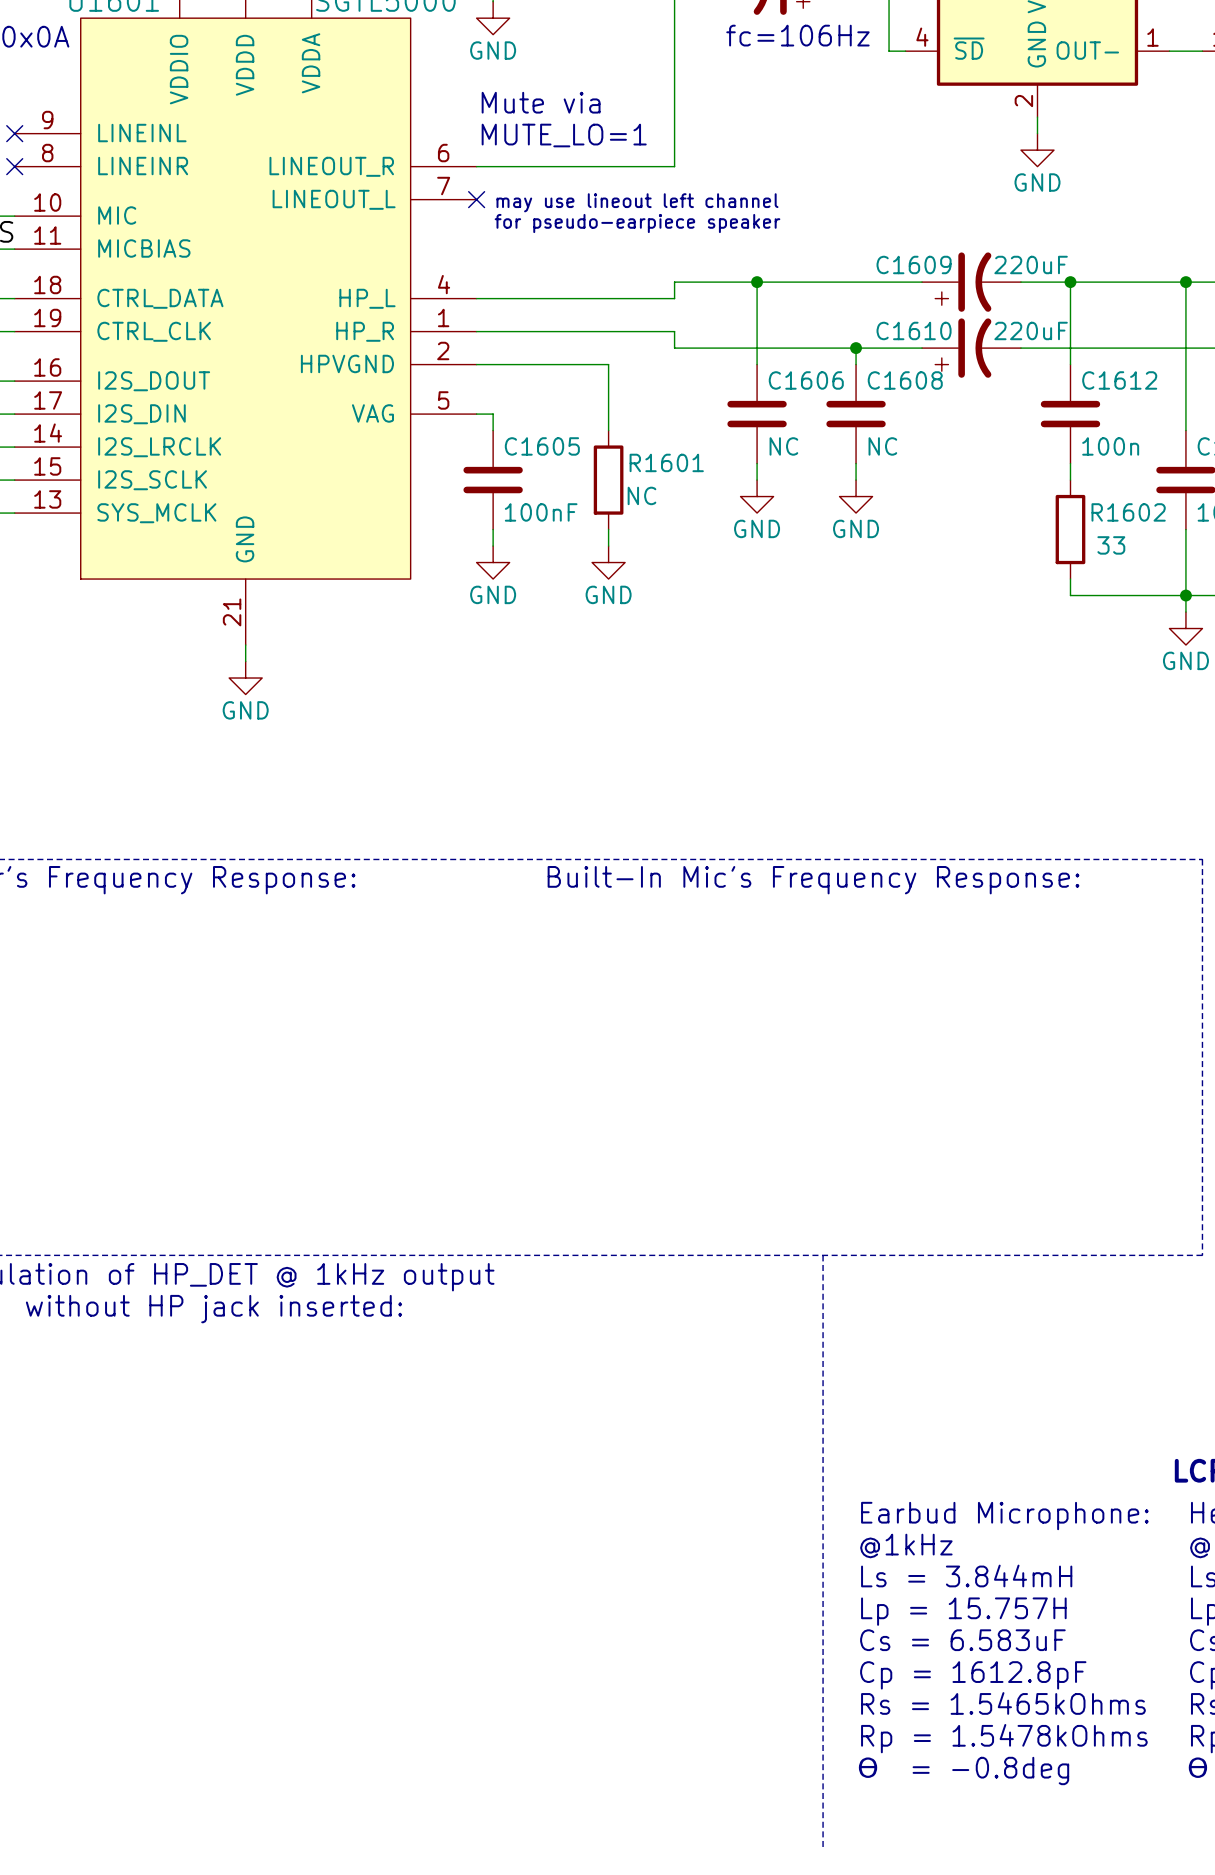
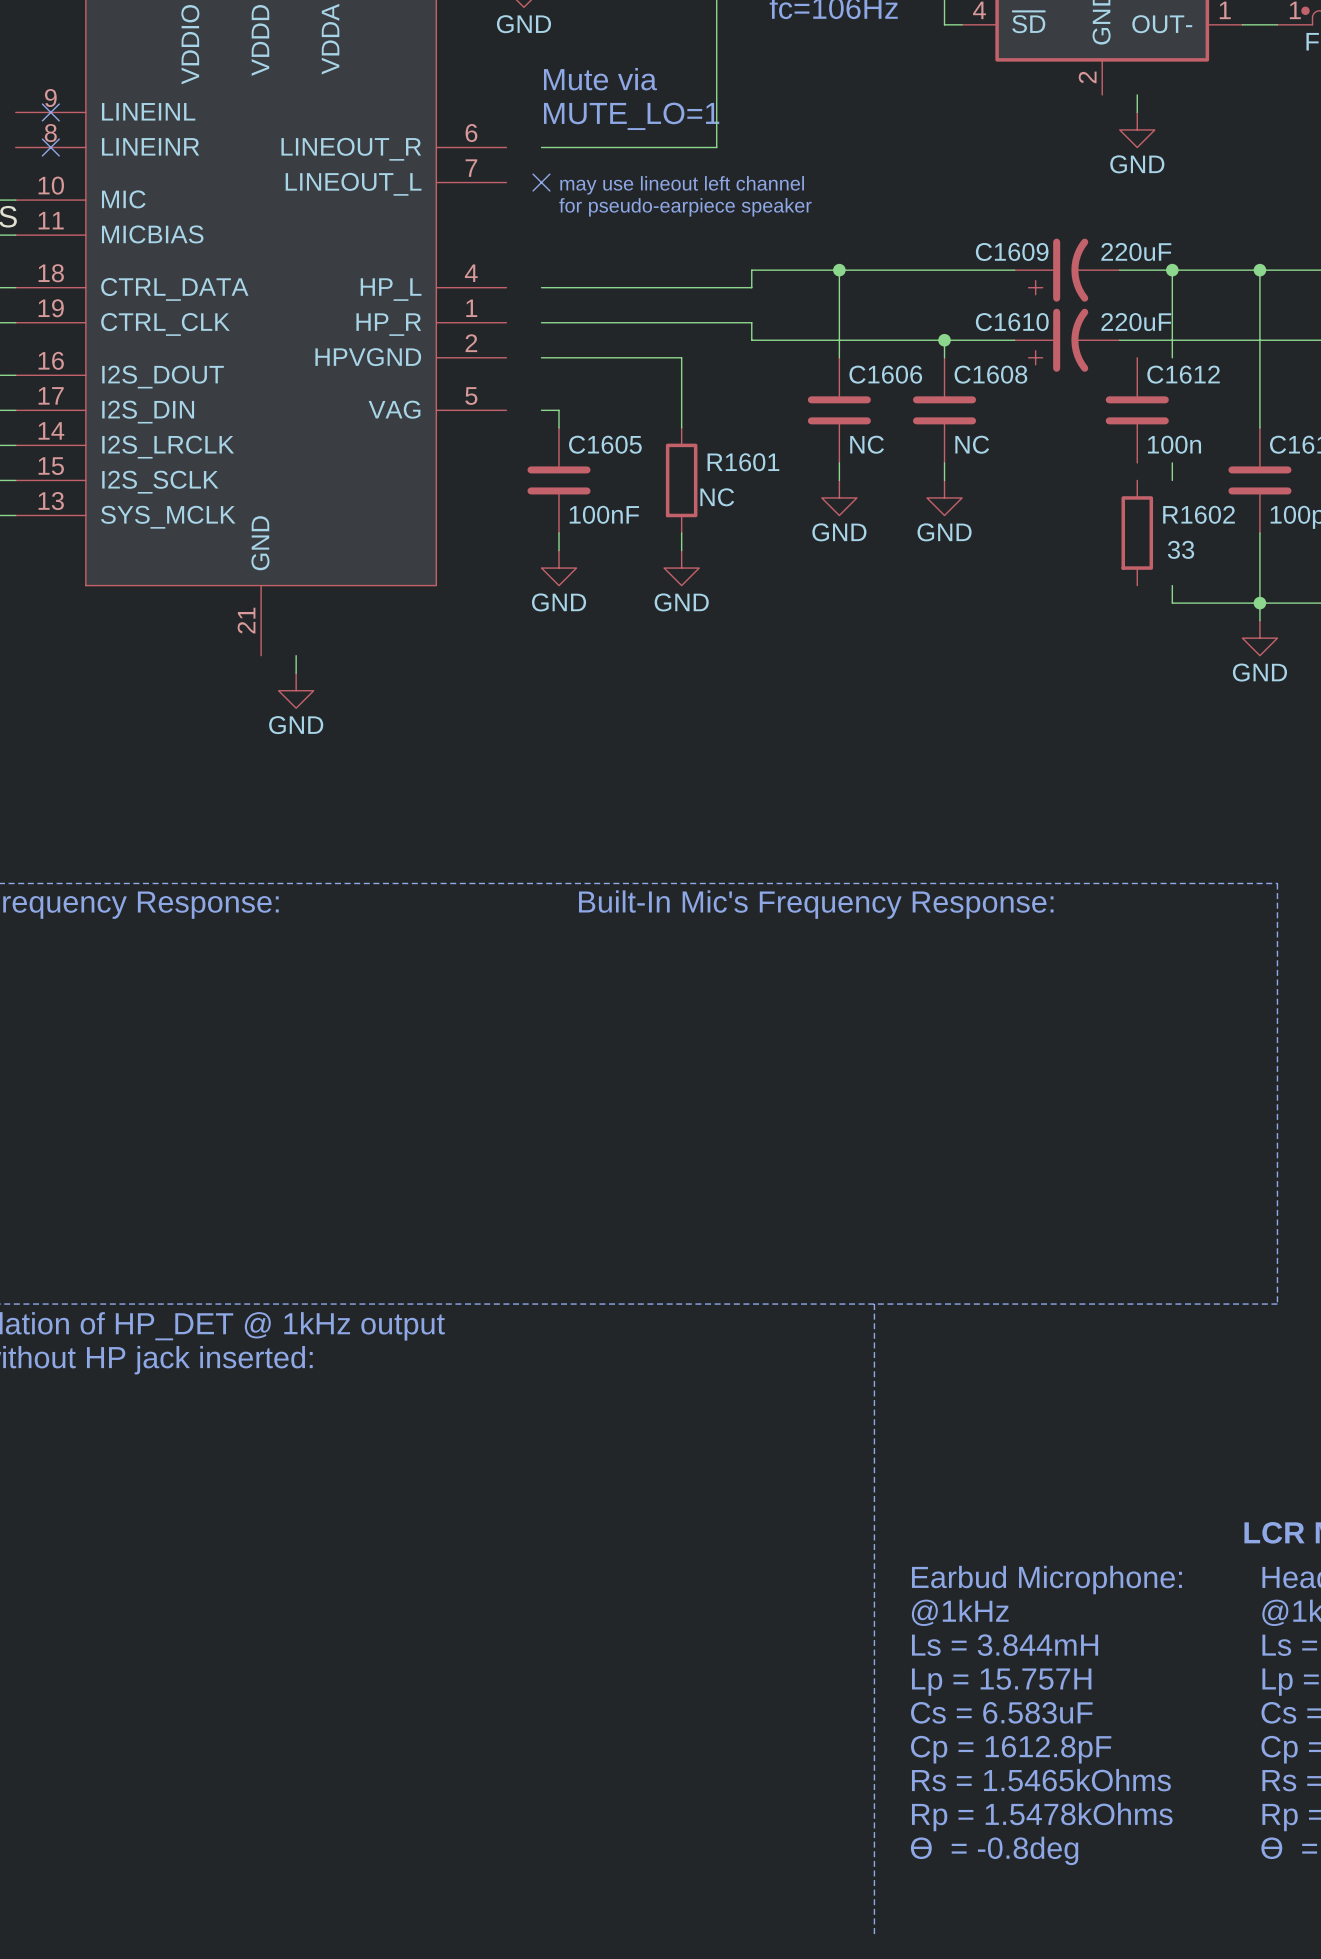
text position: Mute via (541, 102) -> Mute via (600, 79)
wire: (1037, 117) (1037, 133) -> (1137, 94) (1137, 112)
no-connect mark: (14, 133) -> none
no-connect mark: none -> (50, 112)
text position: MUTE_LO=1 (564, 135) -> MUTE_LO=1 (631, 116)
power symbol position: GND (1037, 150) -> GND (1137, 129)
no-connect mark: (14, 166) -> none
no-connect mark: none -> (50, 147)
wire: (476, 166) (509, 166) -> none
no-connect mark position: (476, 199) -> (541, 182)
text position: may use lineout left channel (637, 202) -> may use lineout left channel (682, 185)
text position: for pseudo-earpiece speaker (637, 223) -> for pseudo-earpiece speaker (685, 207)
wire: (707, 282) (674, 282) (674, 298) -> (751, 270) (751, 287) (716, 287)
wire: (757, 282) (757, 364) -> (839, 270) (839, 357)
junction position: (757, 282) -> (839, 270)
C1609 position: (971, 282) -> (1067, 270)
wire: (1070, 282) (1070, 364) -> (1172, 270) (1172, 357)
junction position: (1070, 282) -> (1172, 270)
wire: (476, 298) (509, 298) -> none
wire: (476, 331) (509, 331) -> none
wire: (674, 331) (674, 348) (707, 348) -> (716, 322) (751, 322) (751, 340)
wire: (856, 348) (856, 364) -> (944, 340) (944, 357)
junction position: (856, 348) -> (944, 340)
C1610 position: (971, 348) -> (1067, 340)
wire: (476, 364) (509, 364) -> none
wire: (608, 364) (608, 430) -> (646, 357) (681, 357) (681, 427)
wire: (476, 414) (493, 414) (493, 430) -> (541, 410) (559, 410) (559, 427)
C1606 position: (757, 414) -> (839, 410)
C1608 position: (856, 414) -> (944, 410)
wire: (757, 463) (757, 480) -> (839, 462) (839, 480)
wire: (856, 463) (856, 480) -> (944, 462) (944, 480)
wire: (1070, 463) (1070, 480) -> (1172, 462) (1172, 480)
C1605 position: (493, 480) -> (559, 480)
R1601 position: (608, 480) -> (681, 480)
power symbol: GND (757, 496) -> none
power symbol: none -> GND (839, 497)
power symbol: GND (856, 496) -> none
power symbol: none -> GND (944, 497)
wire: (493, 529) (493, 546) -> (559, 533) (559, 550)
wire: (608, 529) (608, 546) -> (681, 533) (681, 550)
power symbol position: GND (493, 562) -> GND (559, 568)
power symbol position: GND (608, 562) -> GND (681, 568)
wire: (1070, 579) (1070, 595) (1103, 595) -> (1172, 585) (1172, 603)
wire: (245, 645) (245, 661) -> (296, 655) (296, 673)
power symbol position: GND (245, 678) -> GND (296, 690)

